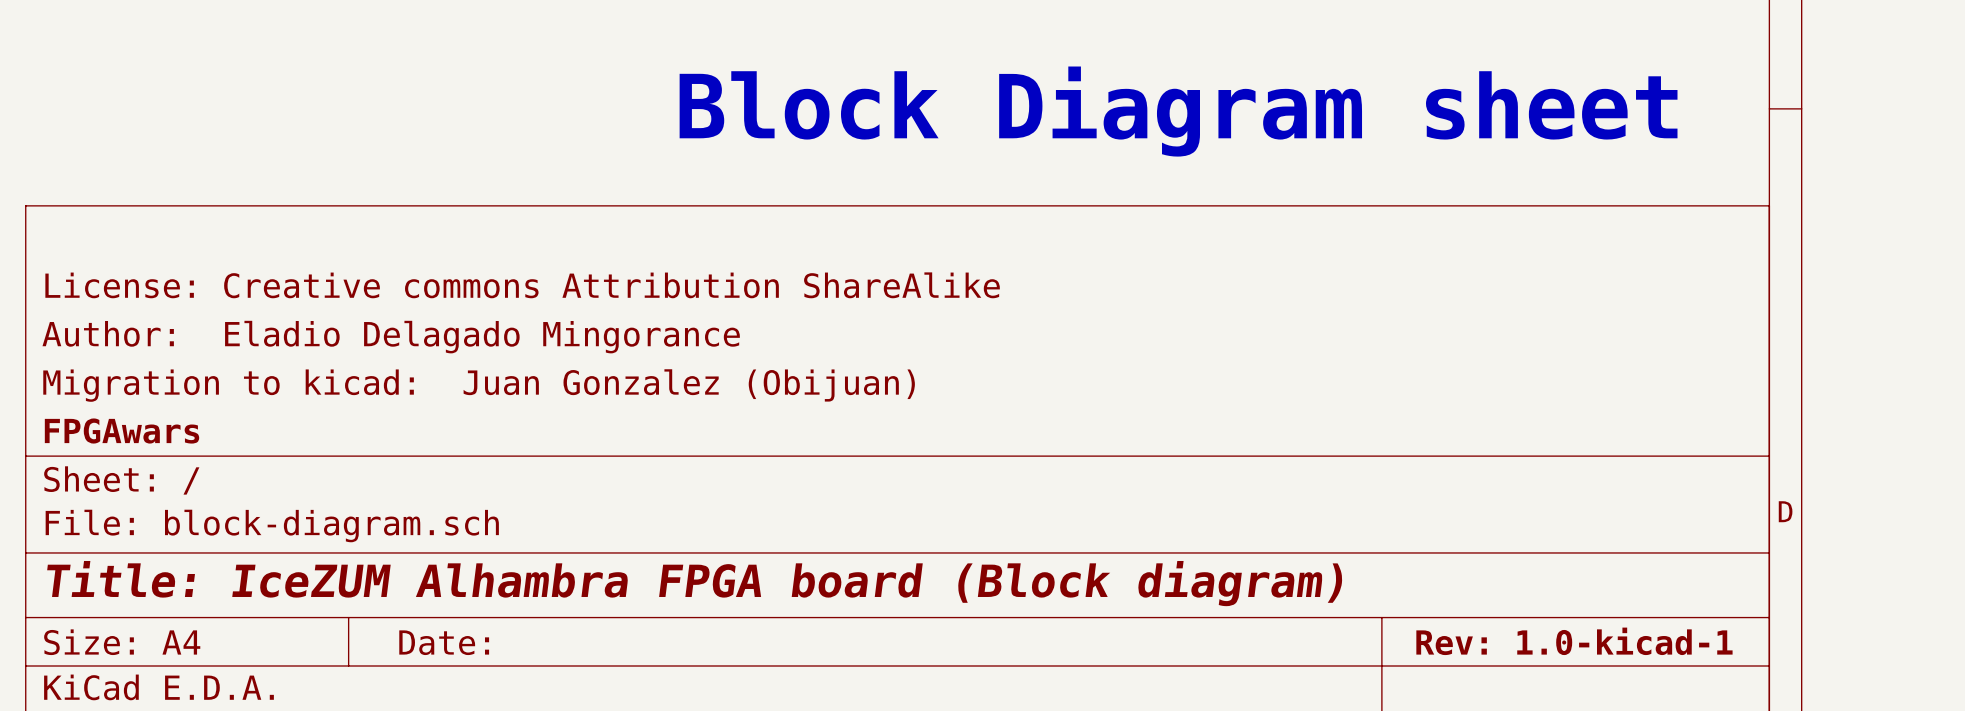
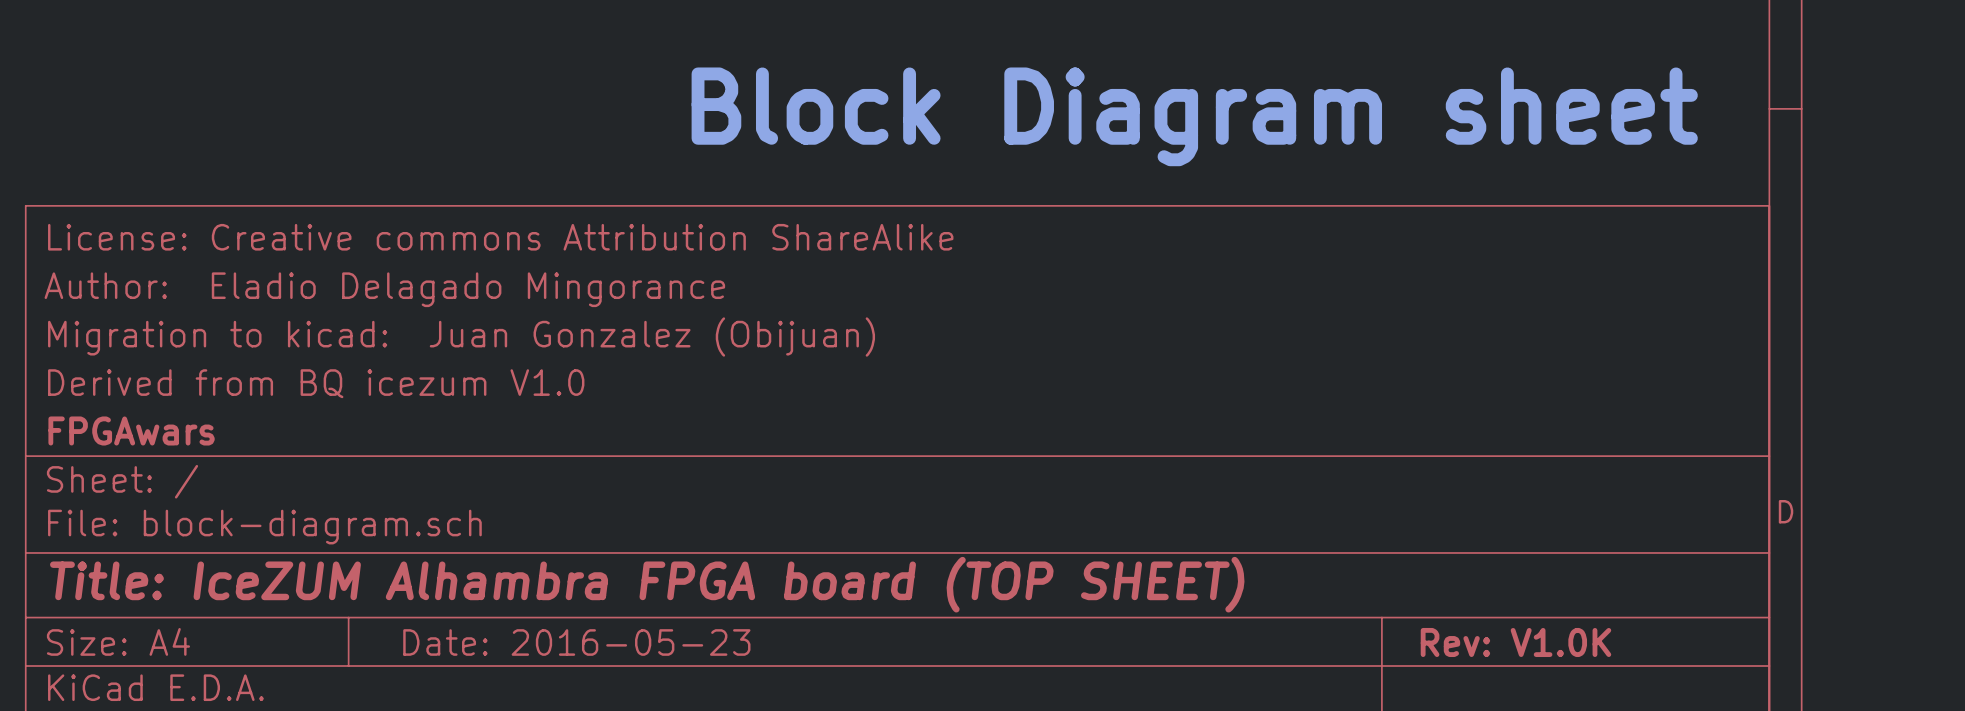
title block: none -> License: Creative commons Attribution ShareAlike (500, 237)
title block: License: Creative commons Attribution ShareAlike (522, 285) -> Author: Eladio Delagado Mingorance (384, 289)
title block: Author: Eladio Delagado Mingorance (391, 337) -> Migration to kicad: Juan Gonzalez (Obijuan) (461, 337)
title block: Migration to kicad: Juan Gonzalez (Obijuan) (479, 385) -> Derived from BQ icezum V1.0 (316, 383)
title block: Title: IceZUM Alhambra FPGA board (Block diagram) (694, 583) -> Title: IceZUM Alhambra FPGA board (TOP SHEET) (647, 584)
title block: Rev: 1.0-kicad-1 (1574, 641) -> Rev: V1.0K (1515, 642)
title block: Date: (444, 642) -> Date: 2016-05-23 (576, 642)

